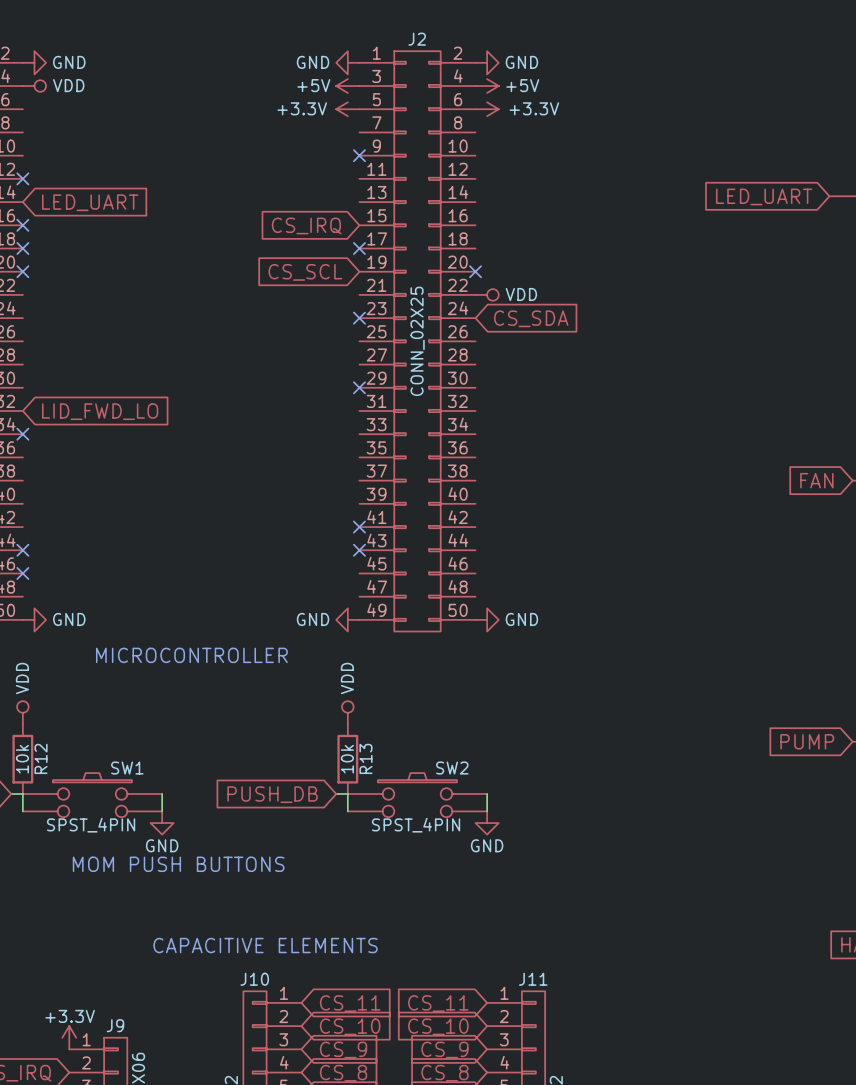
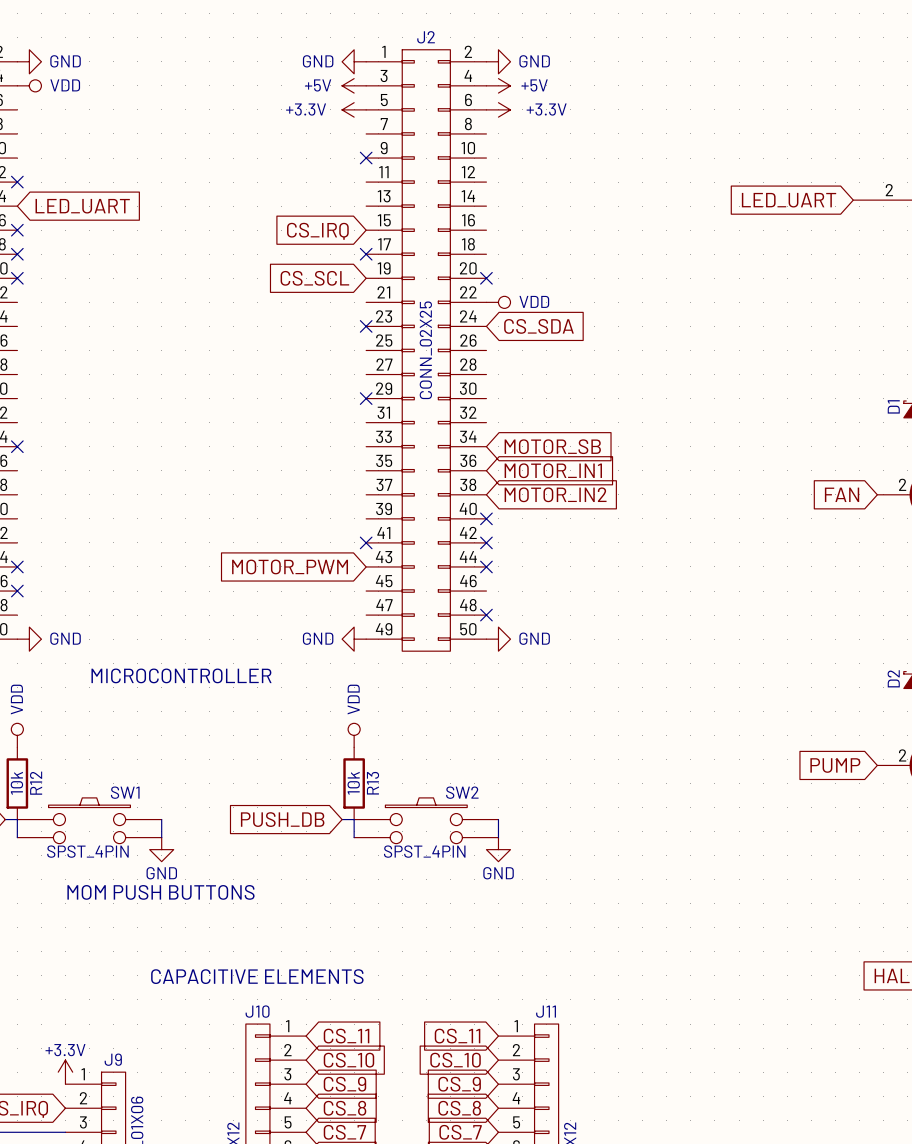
global label: LID_FWD_LO (100, 411) -> none
global label: none -> MOTOR_SB (552, 446)
global label: none -> MOTOR_IN1 (553, 470)
global label: none -> MOTOR_IN2 (555, 494)
no-connect mark: none -> (486, 518)
no-connect mark: none -> (486, 542)
global label: none -> MOTOR_PWM (290, 566)
no-connect mark: (359, 550) -> none
no-connect mark: none -> (486, 566)
no-connect mark: none -> (486, 615)

